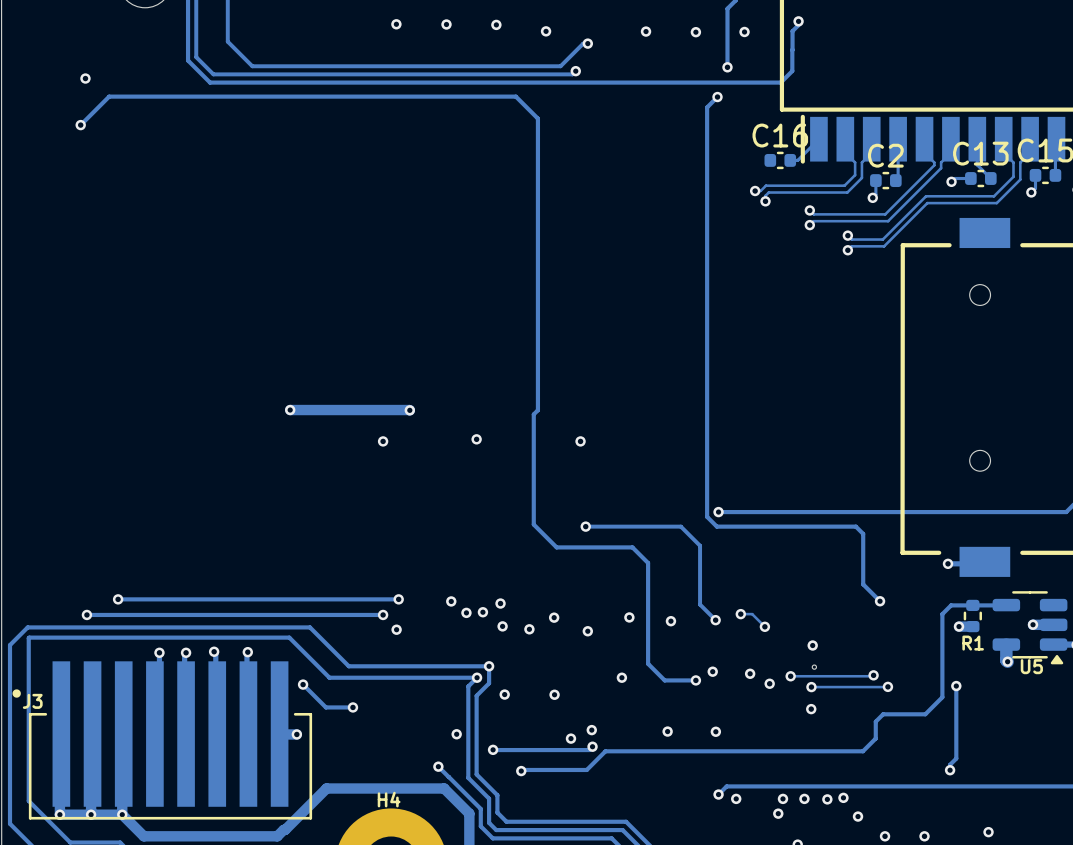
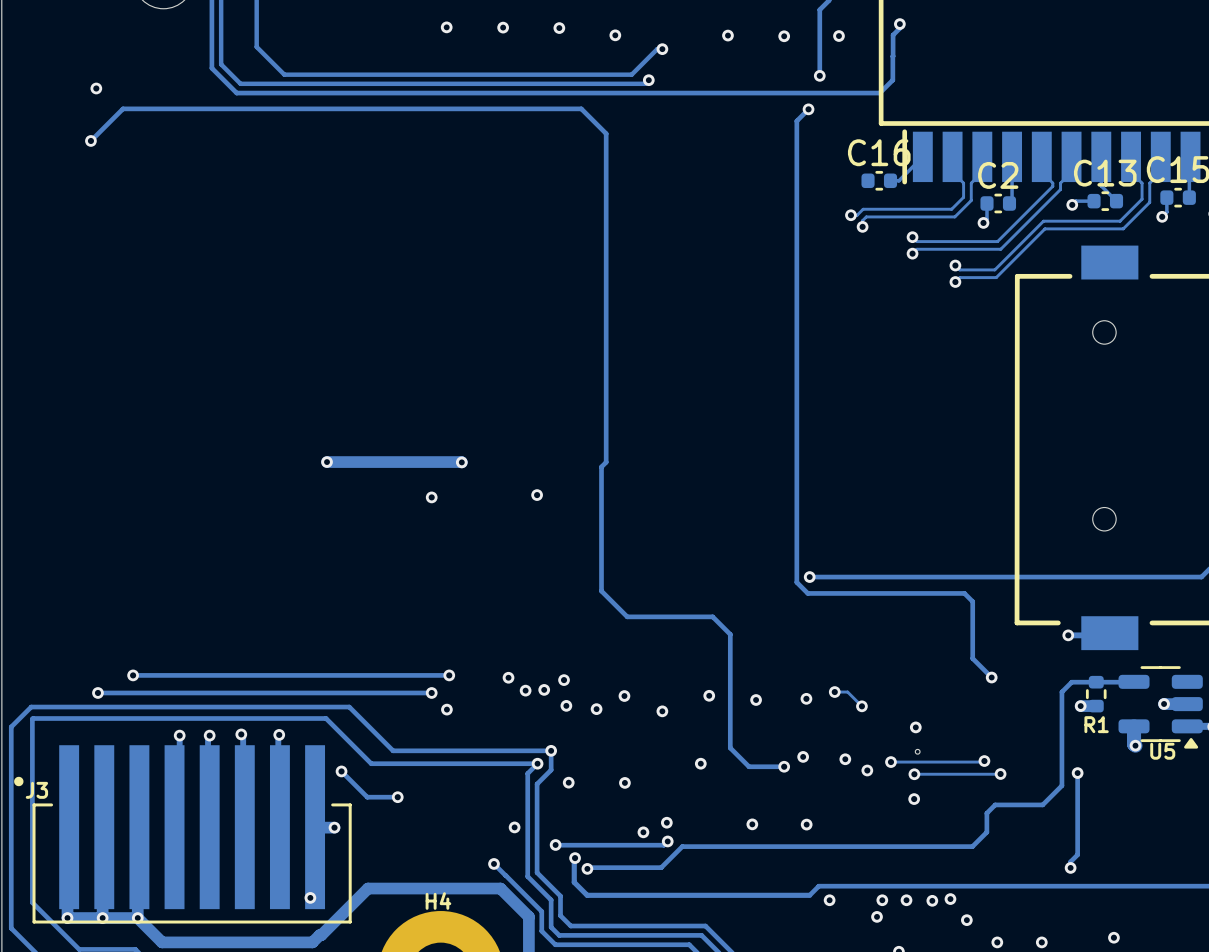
via: (580, 441) -> none
track: (585, 526) (680, 526) (700, 545) (700, 604) (715, 620) -> none
via: (585, 526) -> none
track: none -> (575, 858) (574, 882) (587, 895) (809, 895)
via: none -> (575, 858)
via: (718, 794) -> none
via: none -> (310, 897)

